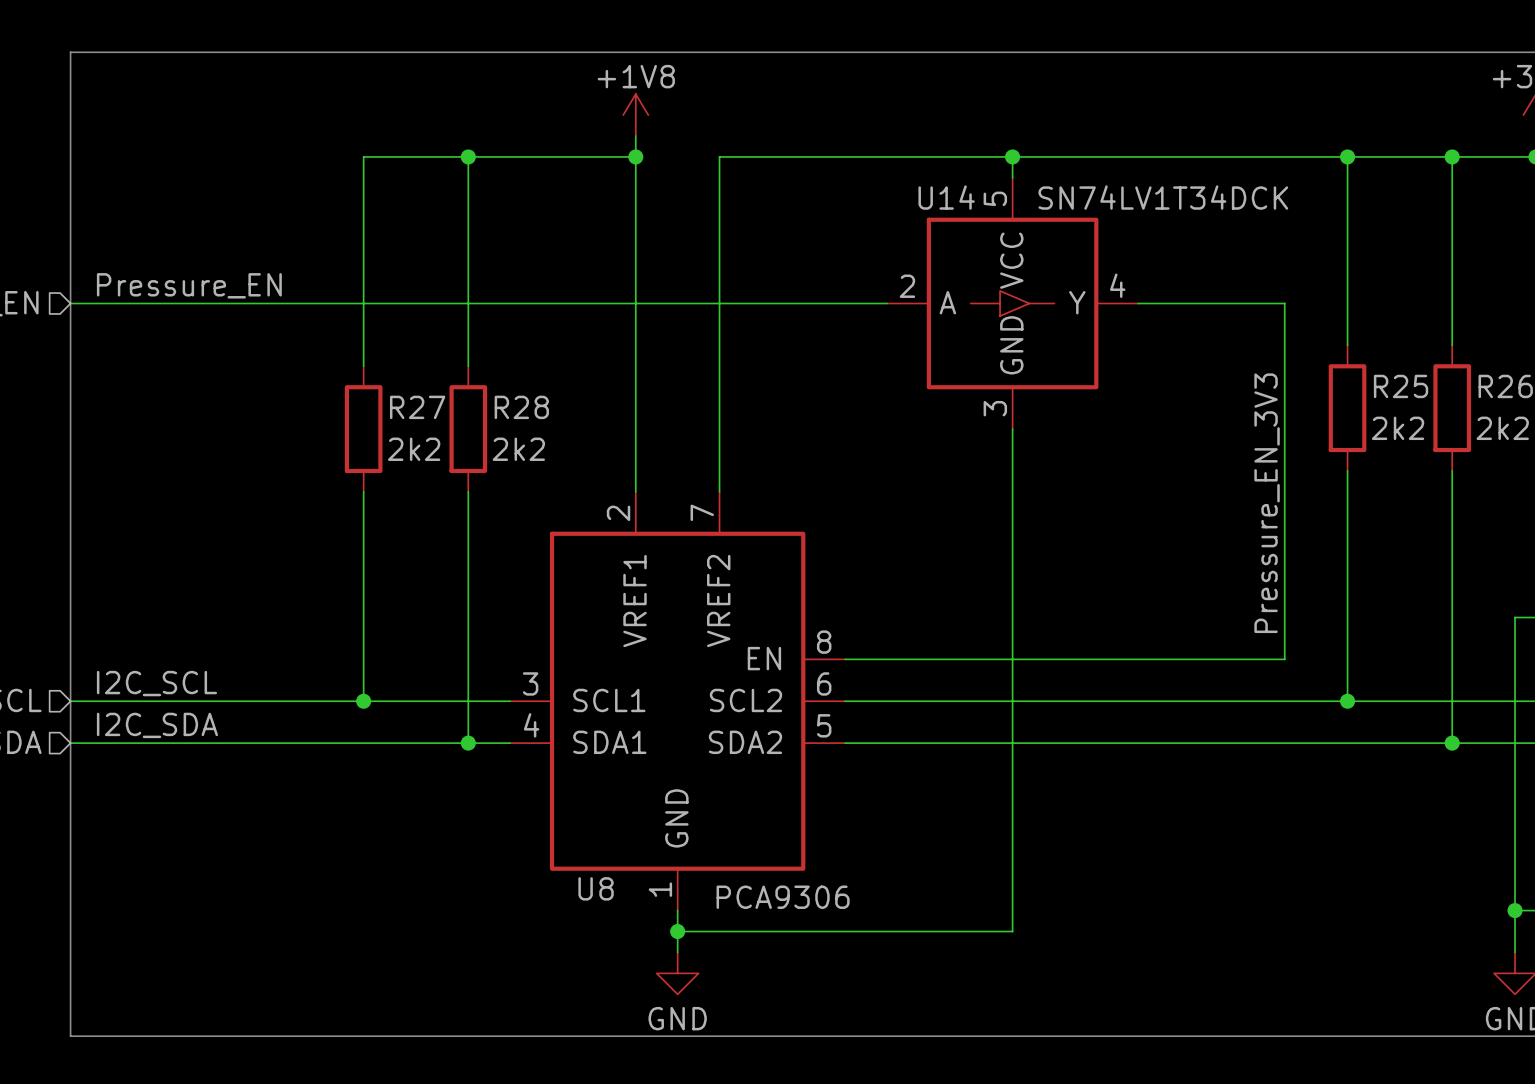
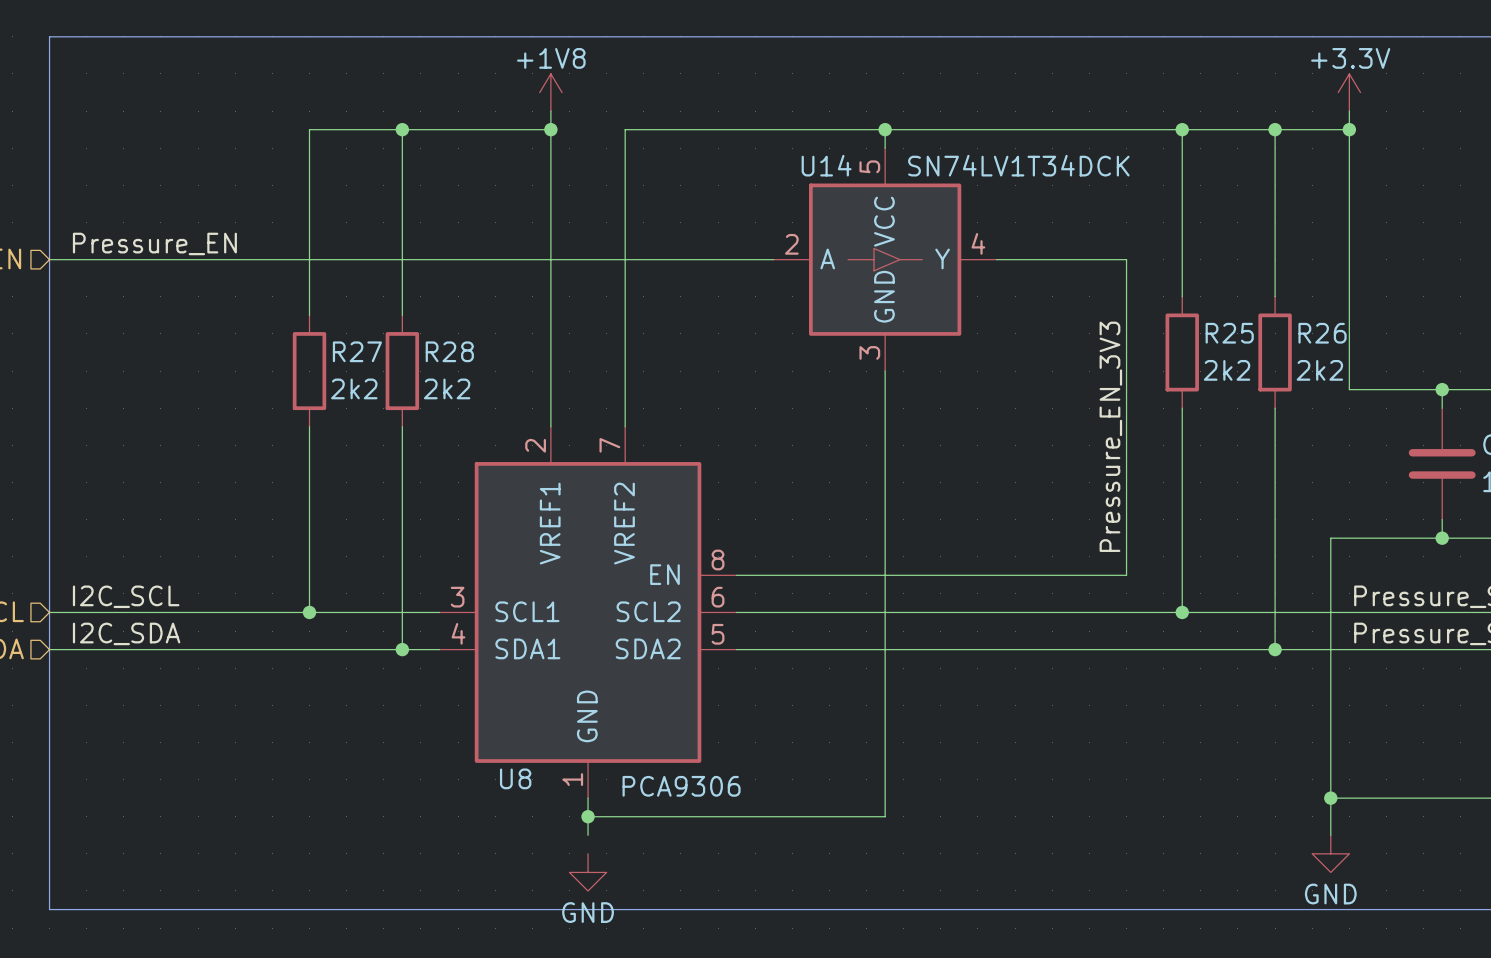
power symbol position: GND (677, 973) -> GND (588, 872)

